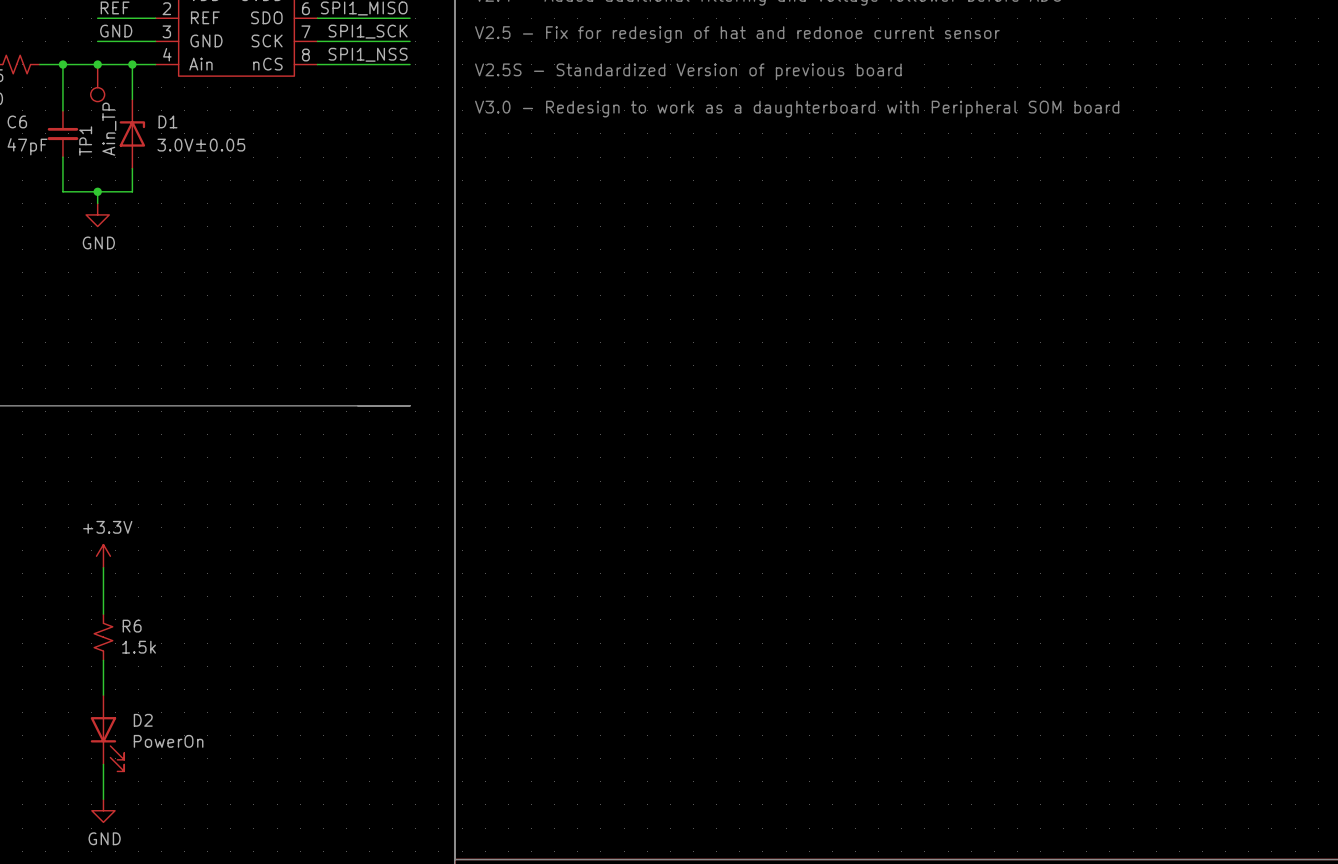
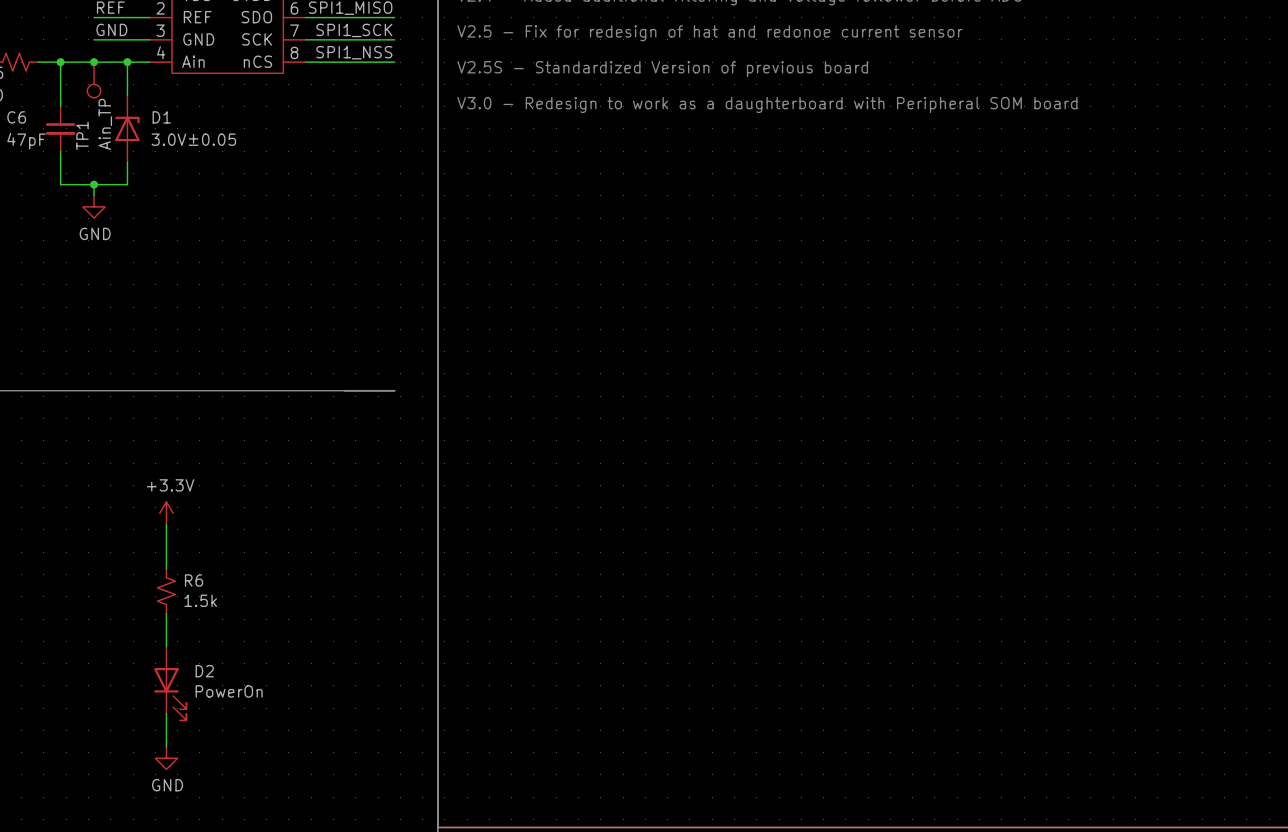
power symbol position: +3.3V (103, 556) -> +3.3V (166, 513)
wire: (103, 567) (103, 614) -> (166, 524) (166, 568)
R6 position: (103, 637) -> (166, 591)
wire: (103, 660) (103, 695) -> (166, 613) (166, 646)
D2 position: (107, 733) -> (170, 683)
wire: (103, 764) (103, 799) -> (166, 713) (166, 747)
power symbol position: GND (103, 810) -> GND (166, 758)

